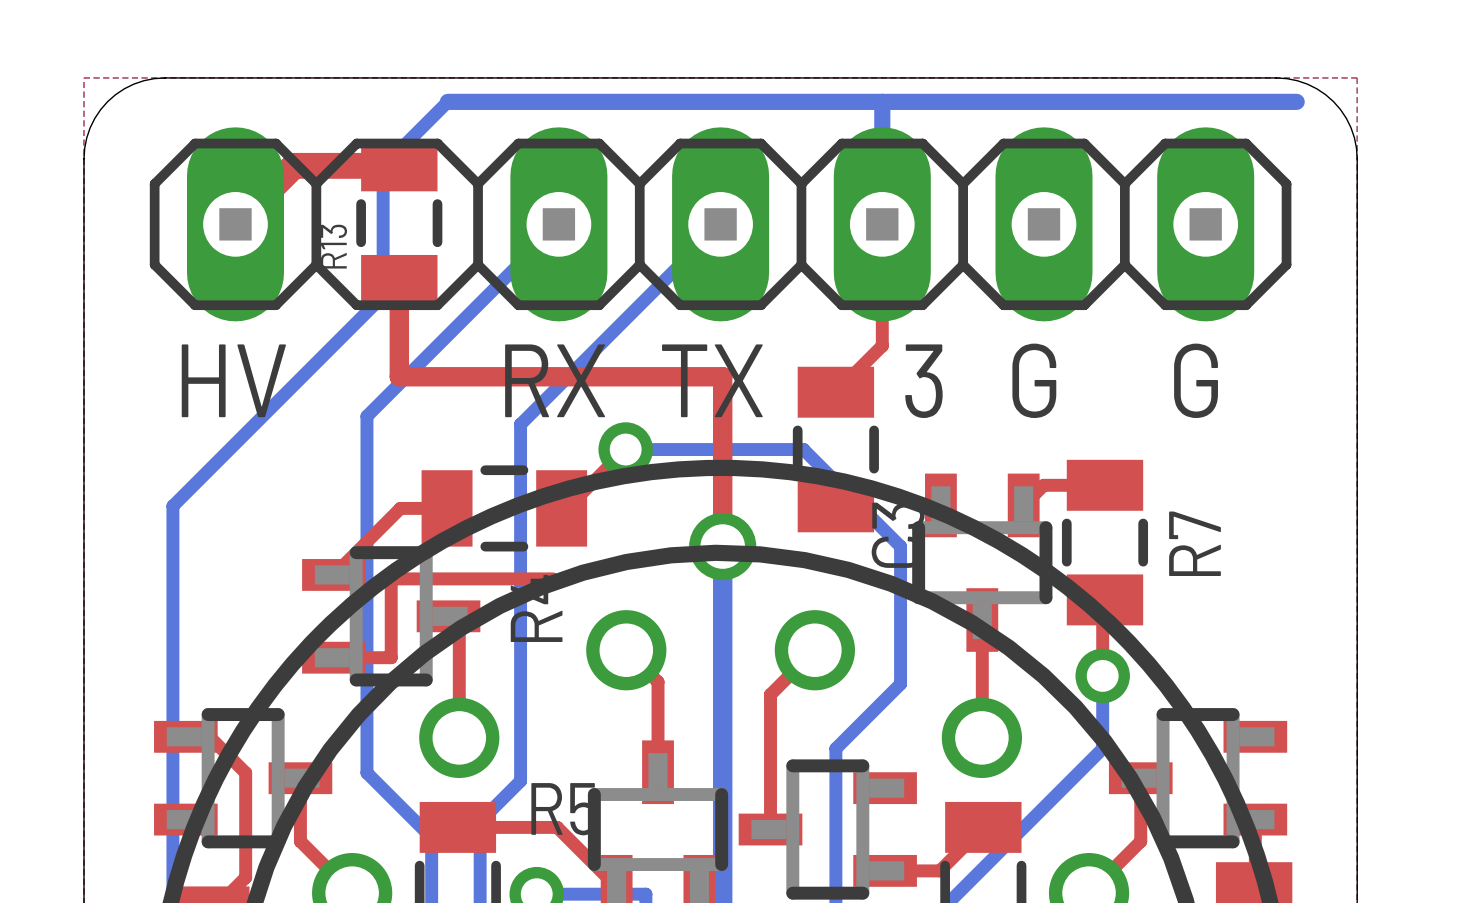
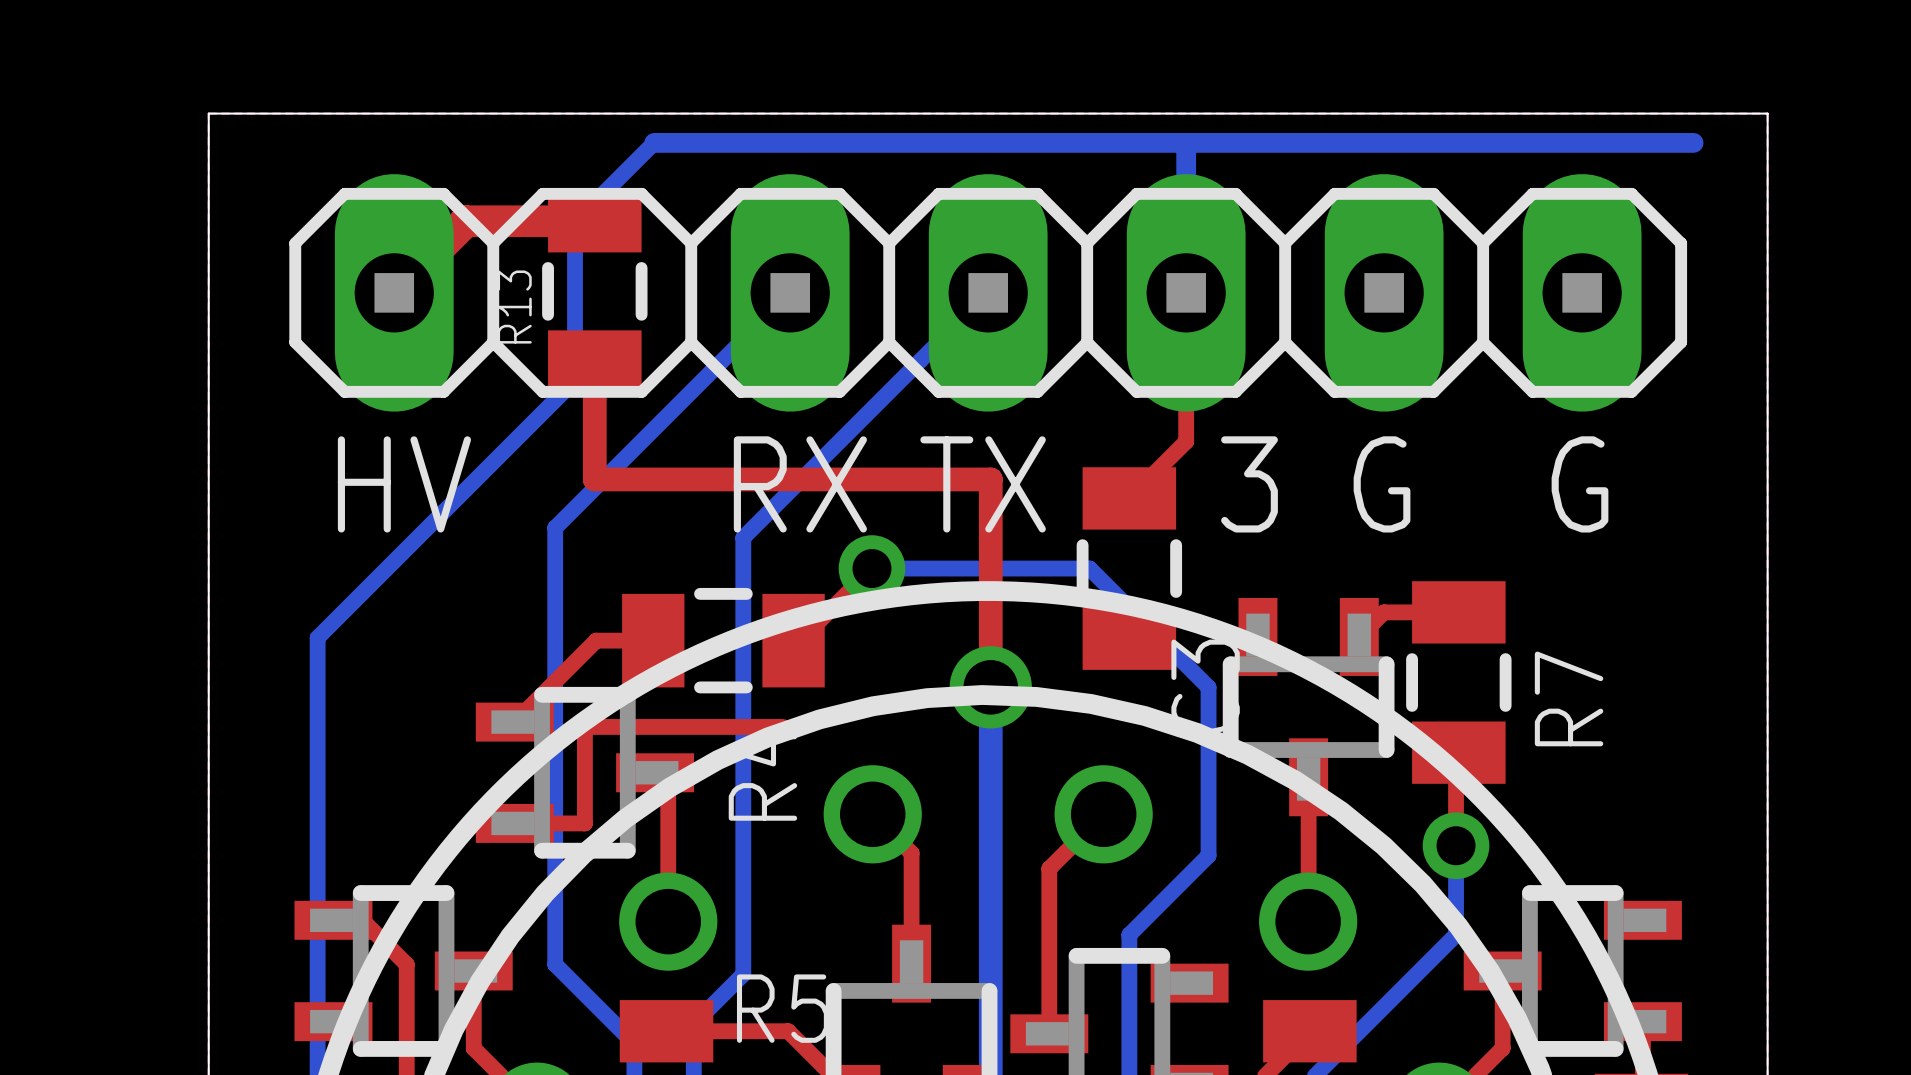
board edge: (164, 77) (133, 84) (107, 101) (90, 127) (83, 158) -> (307, 113) (208, 113) (208, 212)
board edge: (1276, 77) (1307, 84) (1333, 101) (1351, 127) (1357, 158) -> (1668, 113) (1767, 113) (1767, 212)

